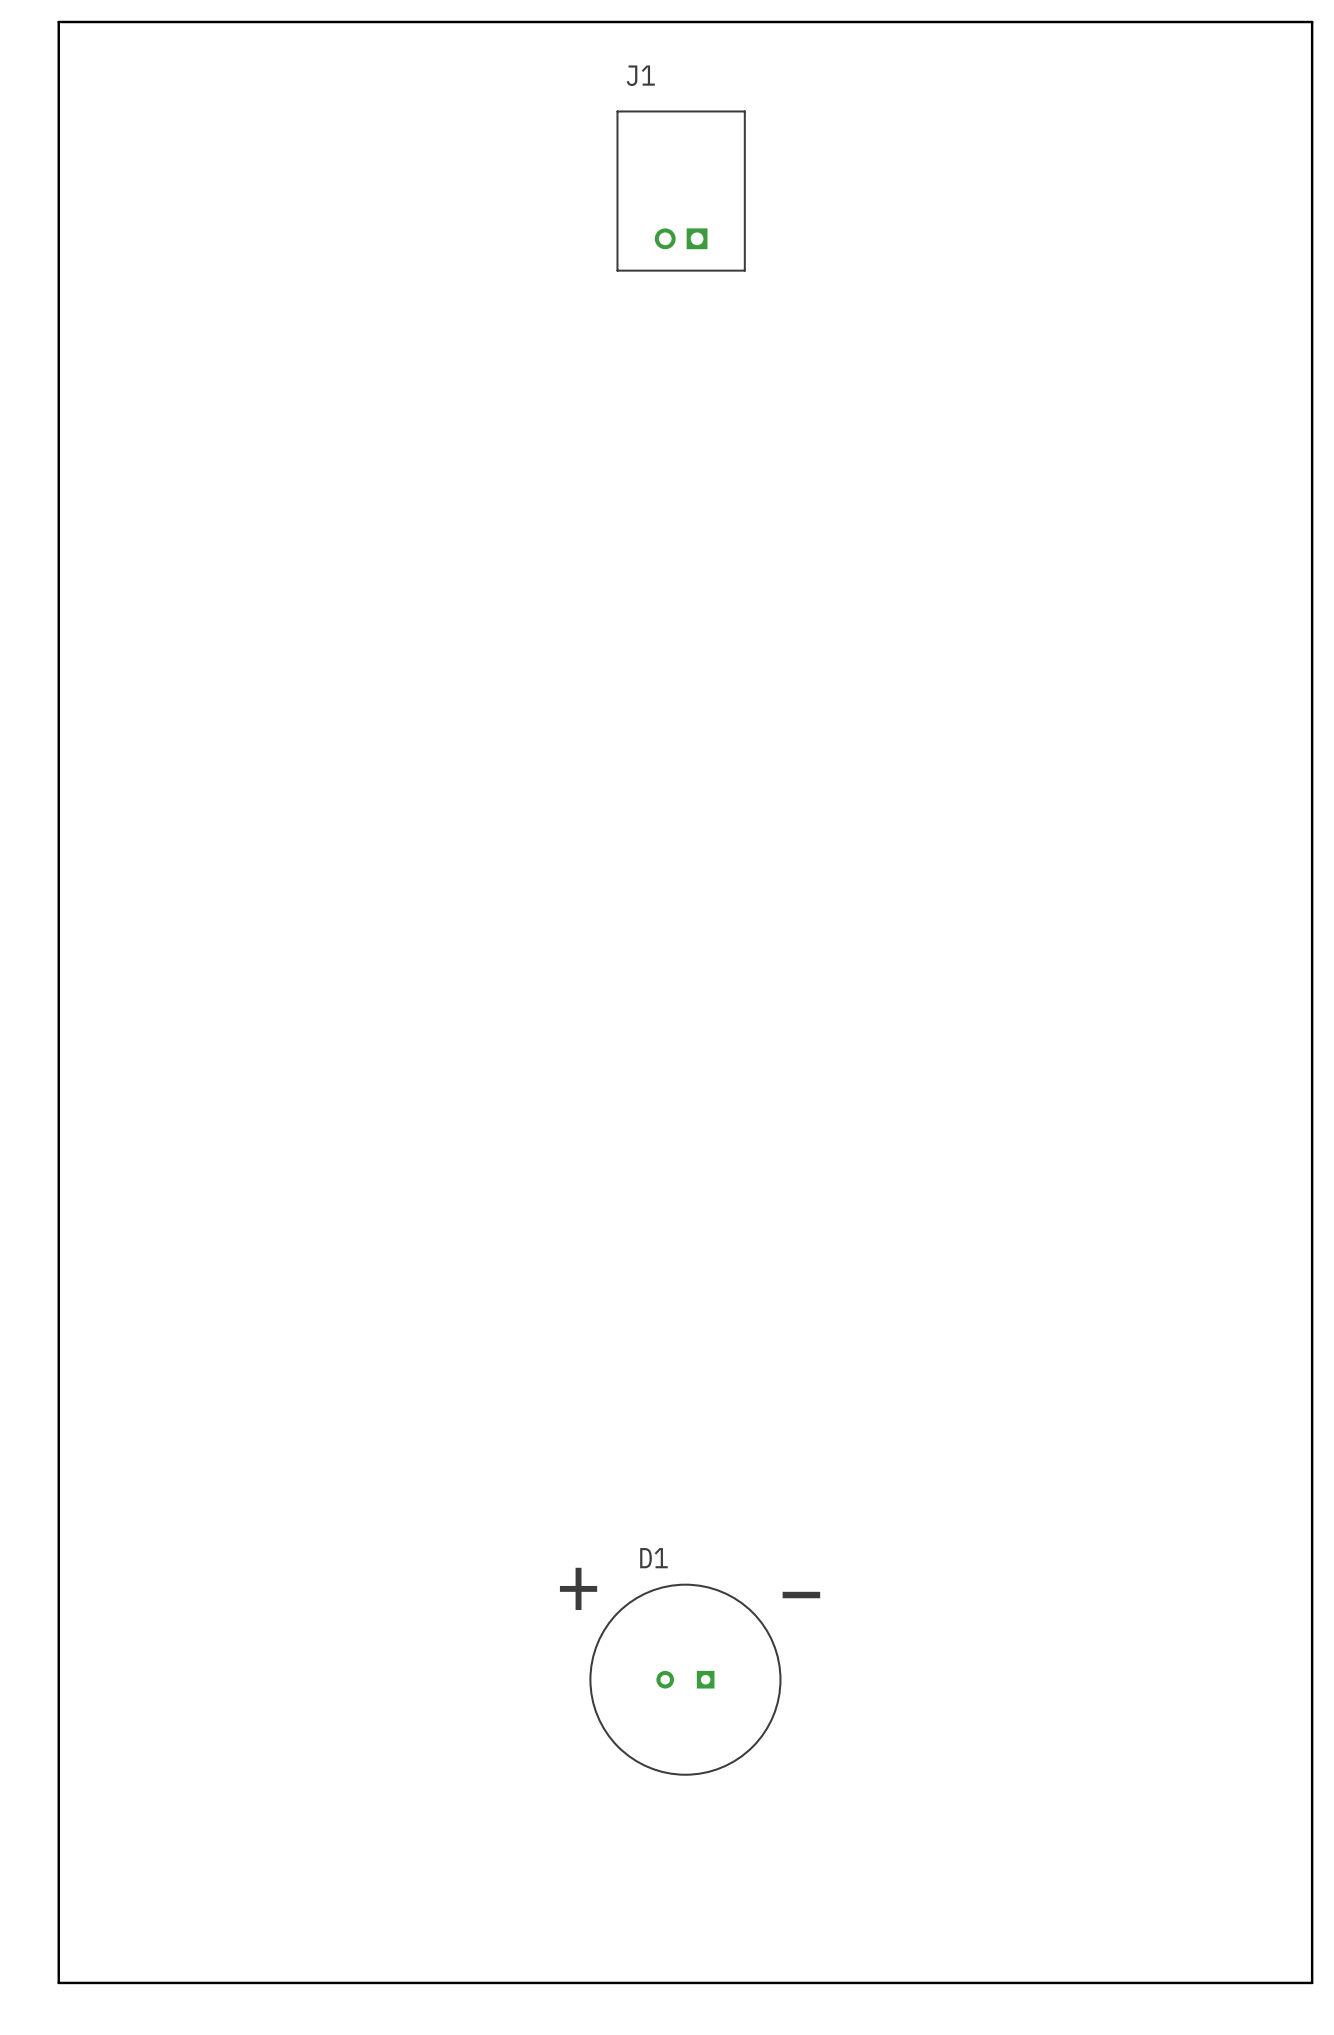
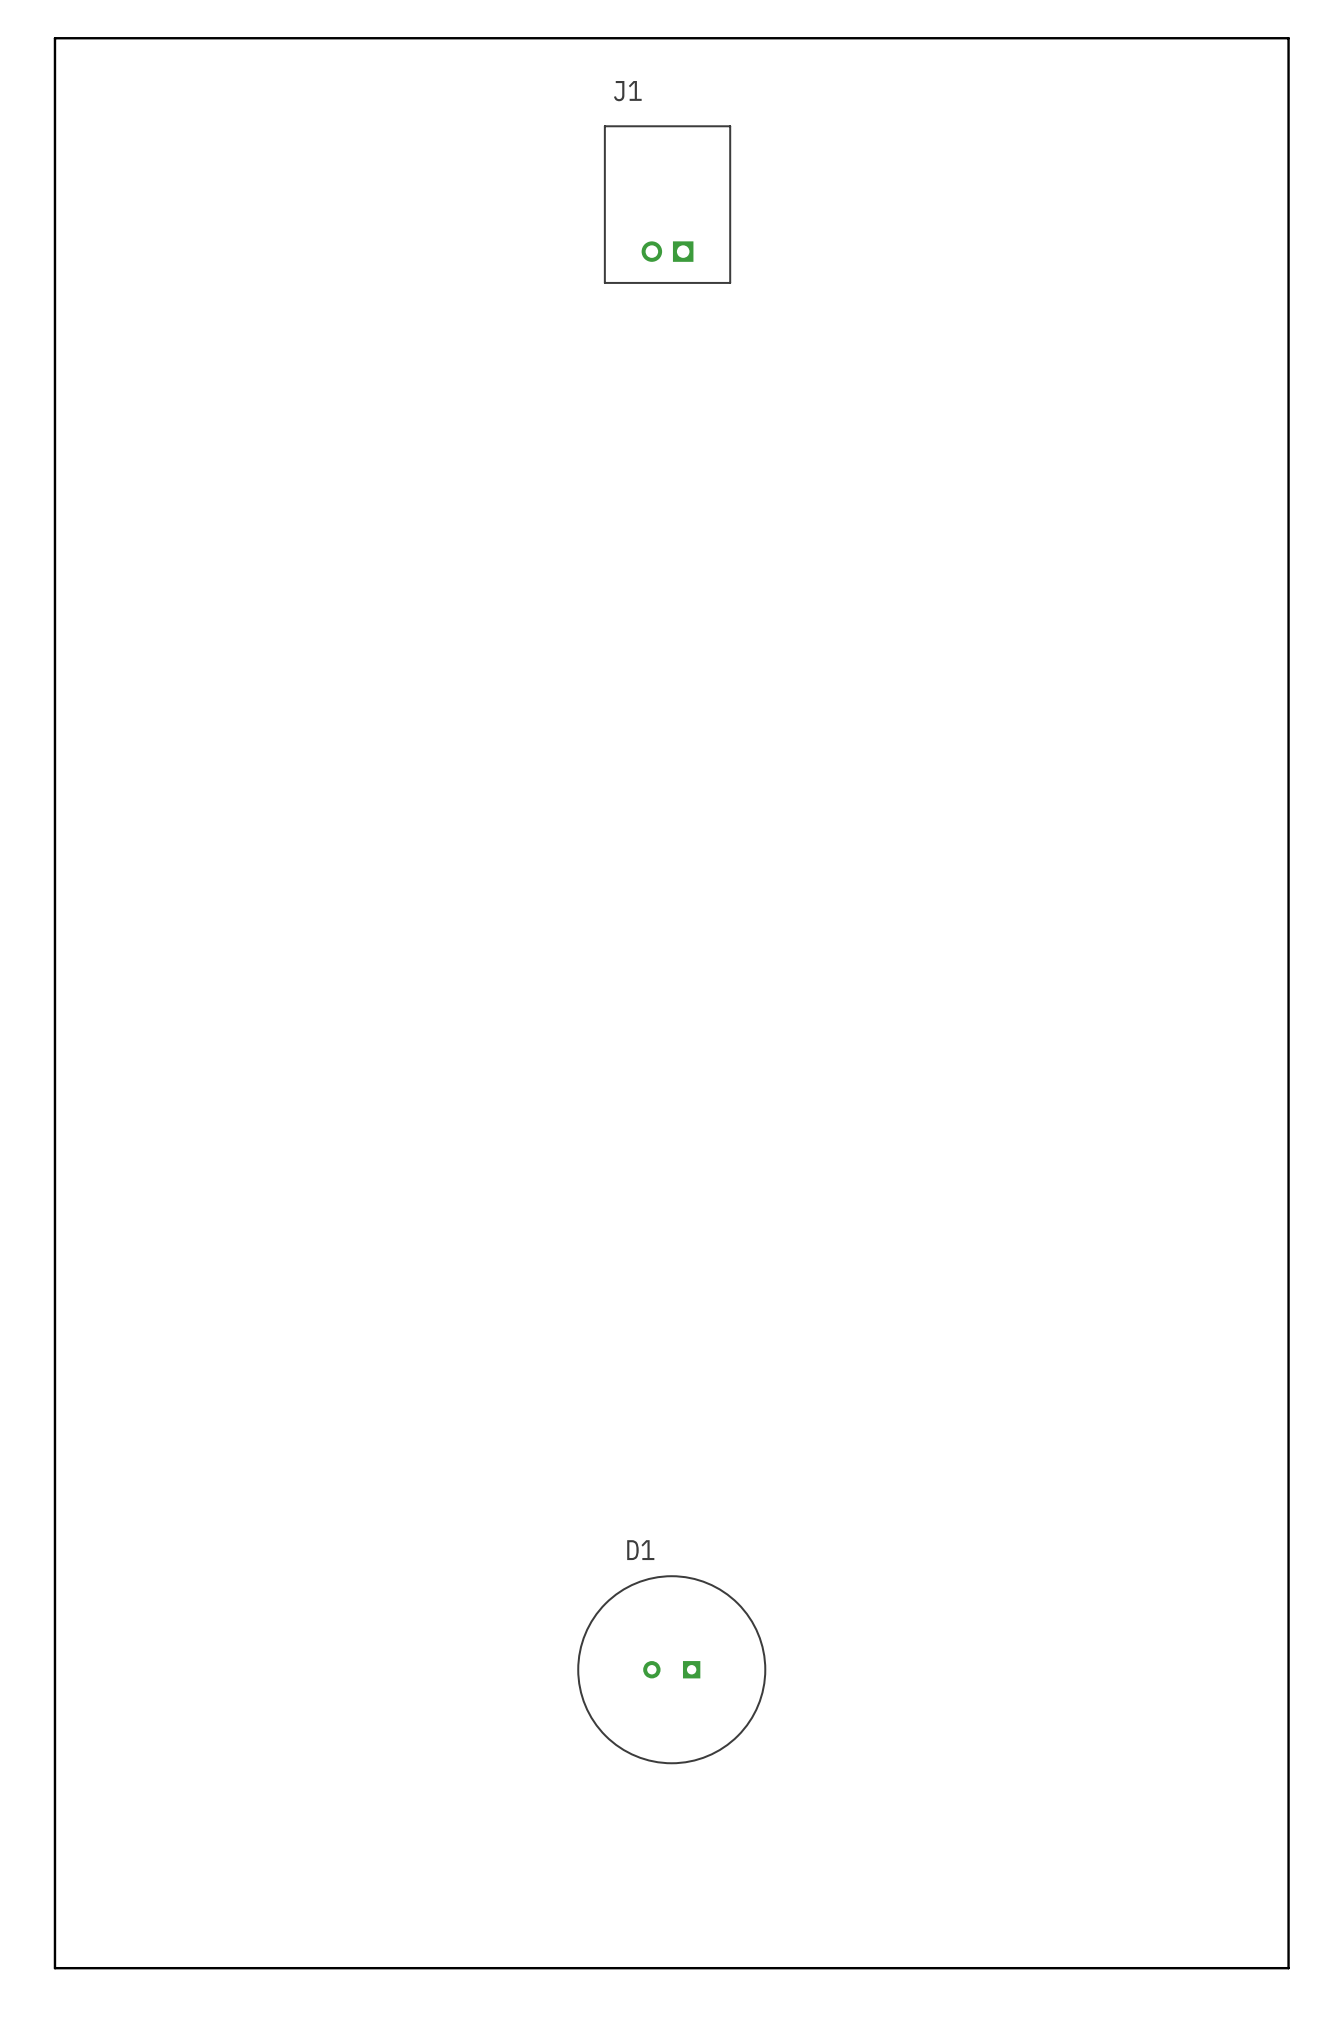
text: + (578, 1588) -> none
text: _ (801, 1595) -> none

